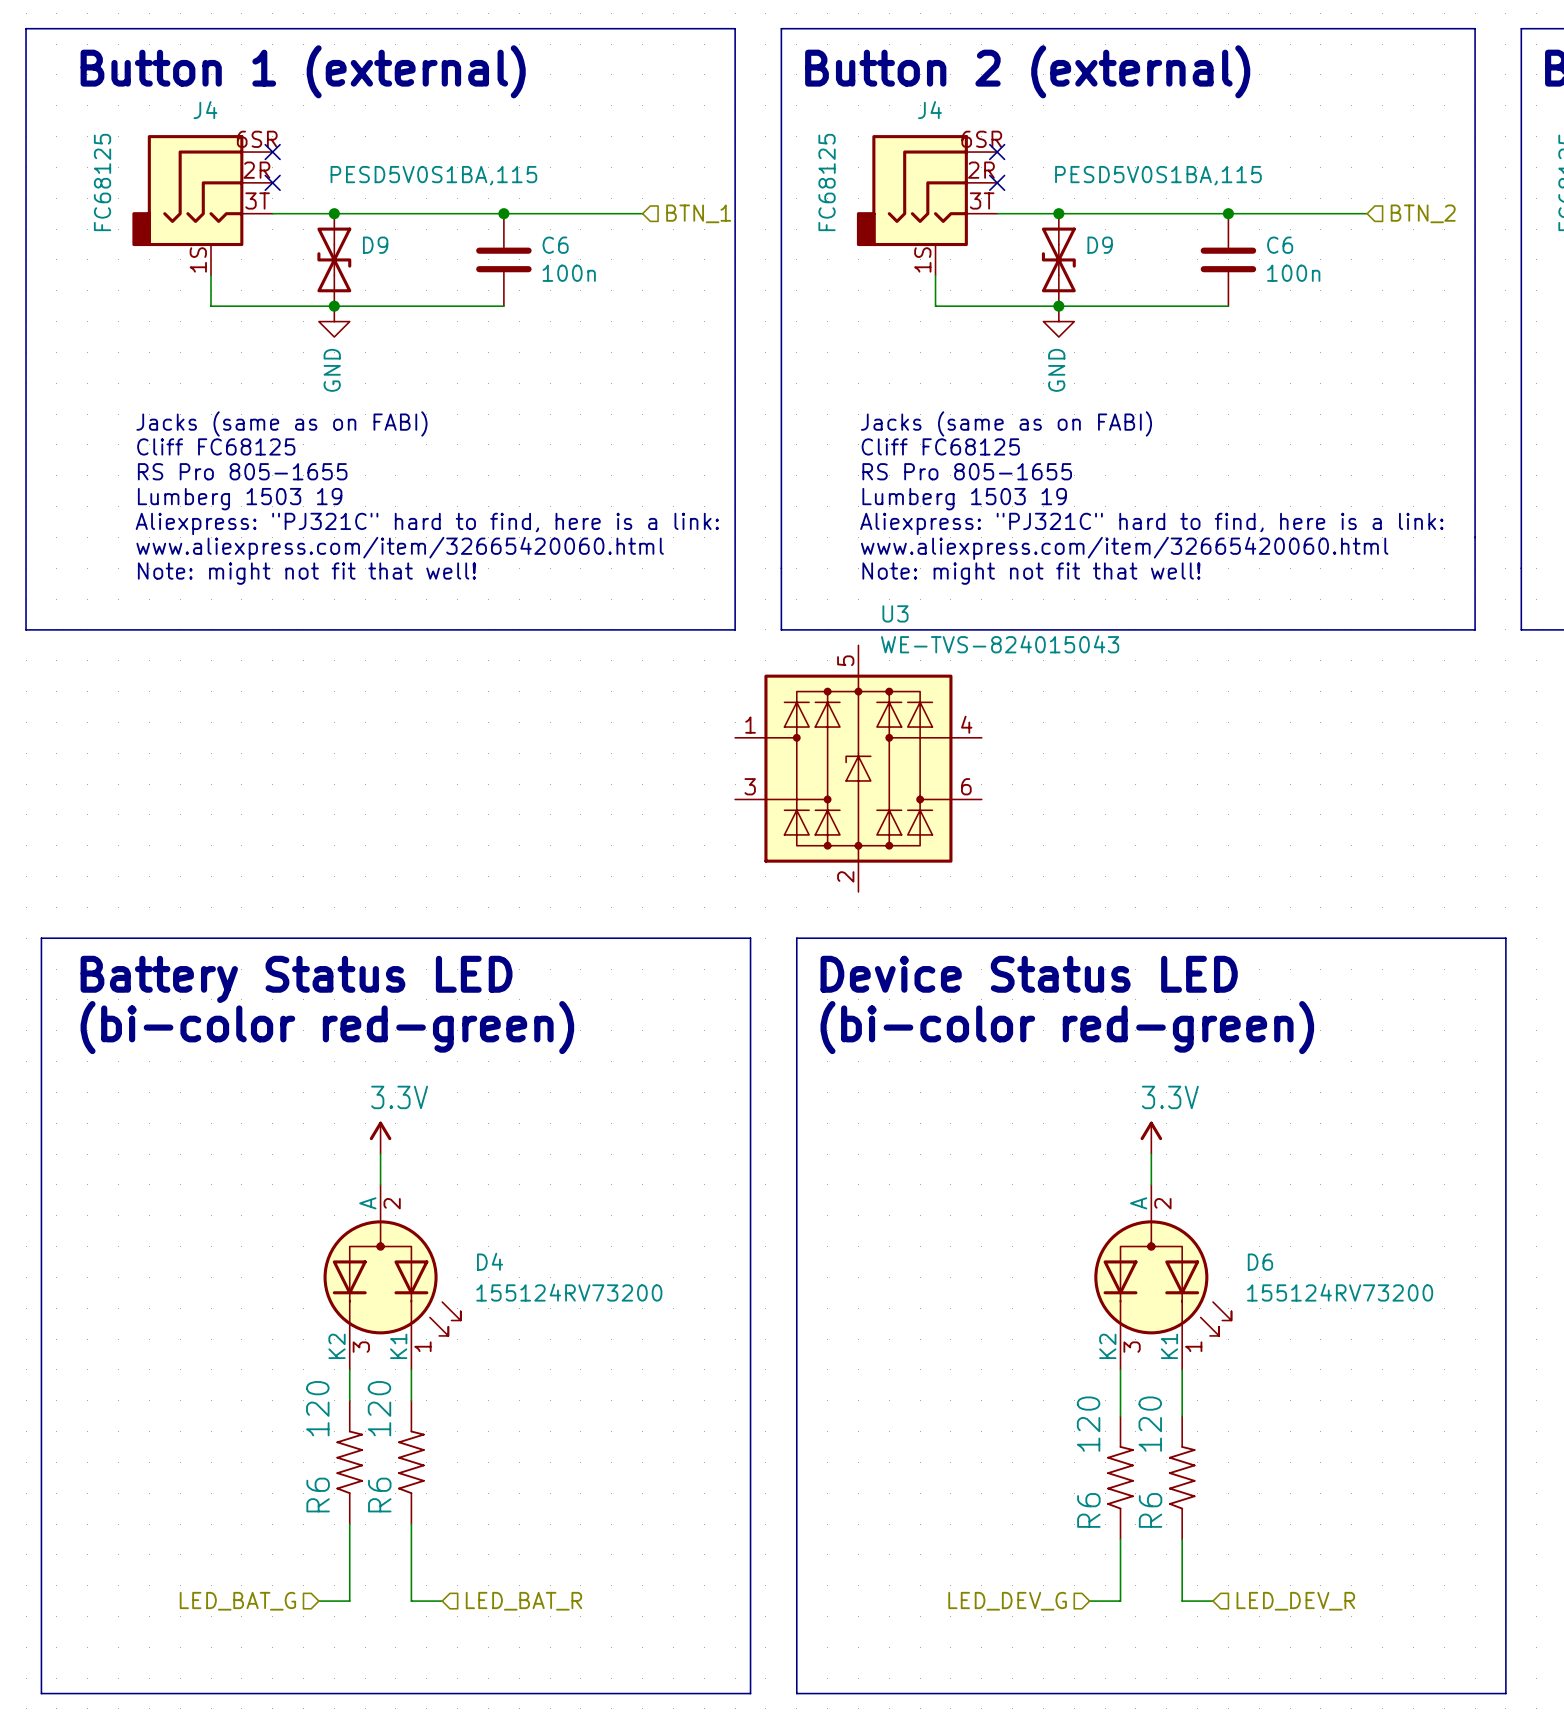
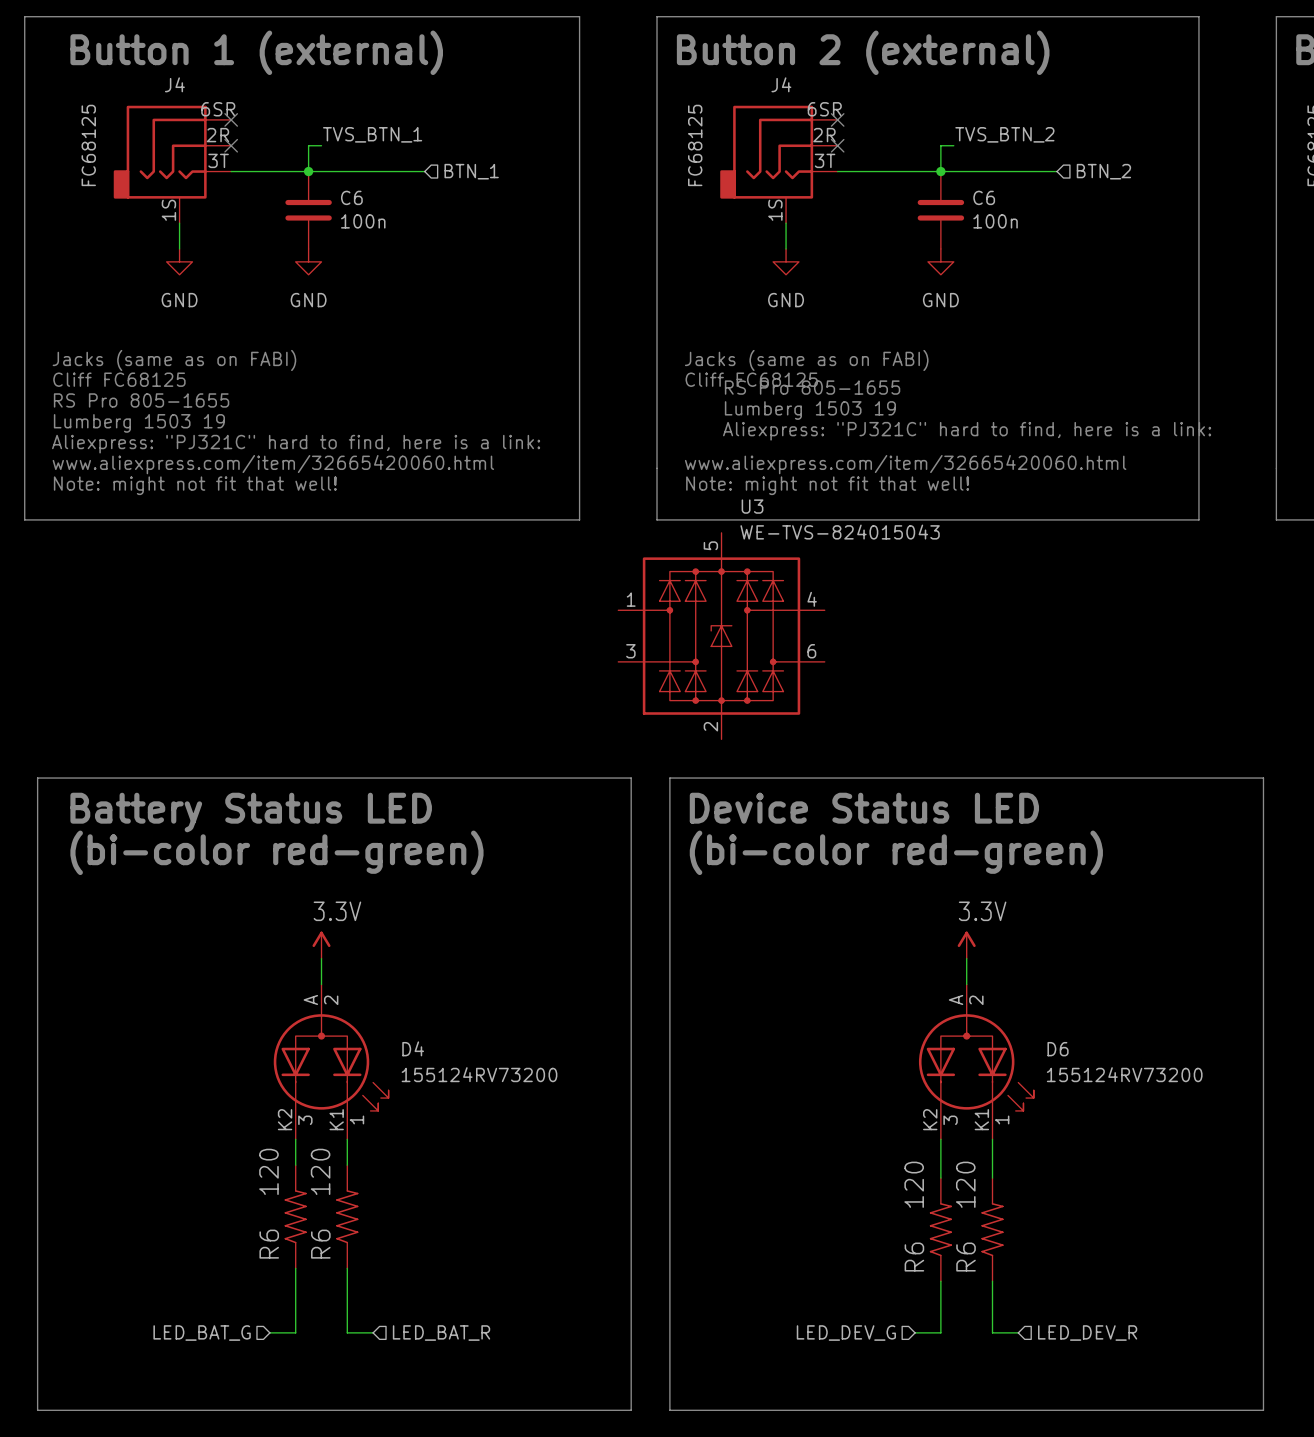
line: (688, 28) (735, 28) (735, 629) (688, 629) -> (579, 16) (579, 519)
line: (1428, 28) (1475, 28) (1475, 629) (1428, 629) -> (1198, 16) (1198, 519)
label: none -> TVS_BTN_1 (372, 134)
label: none -> TVS_BTN_2 (1004, 134)
wire: none -> (321, 145) (308, 145) (308, 171)
wire: none -> (953, 145) (940, 145) (940, 171)
junction position: (334, 213) -> (308, 171)
wire: (503, 213) (642, 213) -> none
junction: (503, 213) -> none
hierarchical label position: BTN_1 (698, 213) -> BTN_1 (471, 171)
junction: (1058, 213) -> none
junction: none -> (940, 171)
junction: (1228, 213) -> none
wire: (1259, 213) (1367, 213) -> none
hierarchical label position: BTN_2 (1423, 213) -> BTN_2 (1103, 171)
D9: PESD5V0S1BA,115 (334, 259) -> none
C6 position: (503, 259) -> (308, 210)
D9: PESD5V0S1BA,115 (1058, 259) -> none
C6 position: (1228, 259) -> (940, 210)
wire: (211, 306) (503, 306) -> none
junction: (334, 306) -> none
wire: (935, 306) (1228, 306) -> none
junction: (1058, 306) -> none
power symbol: none -> GND (179, 261)
power symbol position: GND (334, 321) -> GND (308, 261)
power symbol: none -> GND (786, 261)
power symbol: GND (1058, 321) -> none
power symbol: none -> GND (940, 261)
power symbol text rotation: 0° (332, 370) -> 90° clockwise (308, 300)
text position: Jacks (same as on FABI) (281, 423) -> Jacks (same as on FABI) (174, 360)
text position: Jacks (same as on FABI) (1006, 423) -> Jacks (same as on FABI) (806, 360)
text position: Cliff FC68125 (216, 446) -> Cliff FC68125 (119, 379)
text position: Cliff FC68125 (940, 446) -> Cliff FC68125 (751, 379)
text position: RS Pro 805-1655 (242, 471) -> RS Pro 805-1655 (141, 400)
text position: Lumberg 1503 19 (240, 499) -> Lumberg 1503 19 (139, 423)
text position: Aliexpress: "PJ321C" hard to find, here is a link: (427, 523) -> Aliexpress: "PJ321C" hard to find, here is a link: (296, 444)
text position: www.aliexpress.com/item/32665420060.html (400, 548) -> www.aliexpress.com/item/32665420060.html (273, 464)
text position: www.aliexpress.com/item/32665420060.html (1124, 548) -> www.aliexpress.com/item/32665420060.html (905, 464)
text position: Note: might not fit that well! (306, 573) -> Note: might not fit that well! (195, 485)
text position: Note: might not fit that well! (1031, 573) -> Note: might not fit that well! (827, 485)

